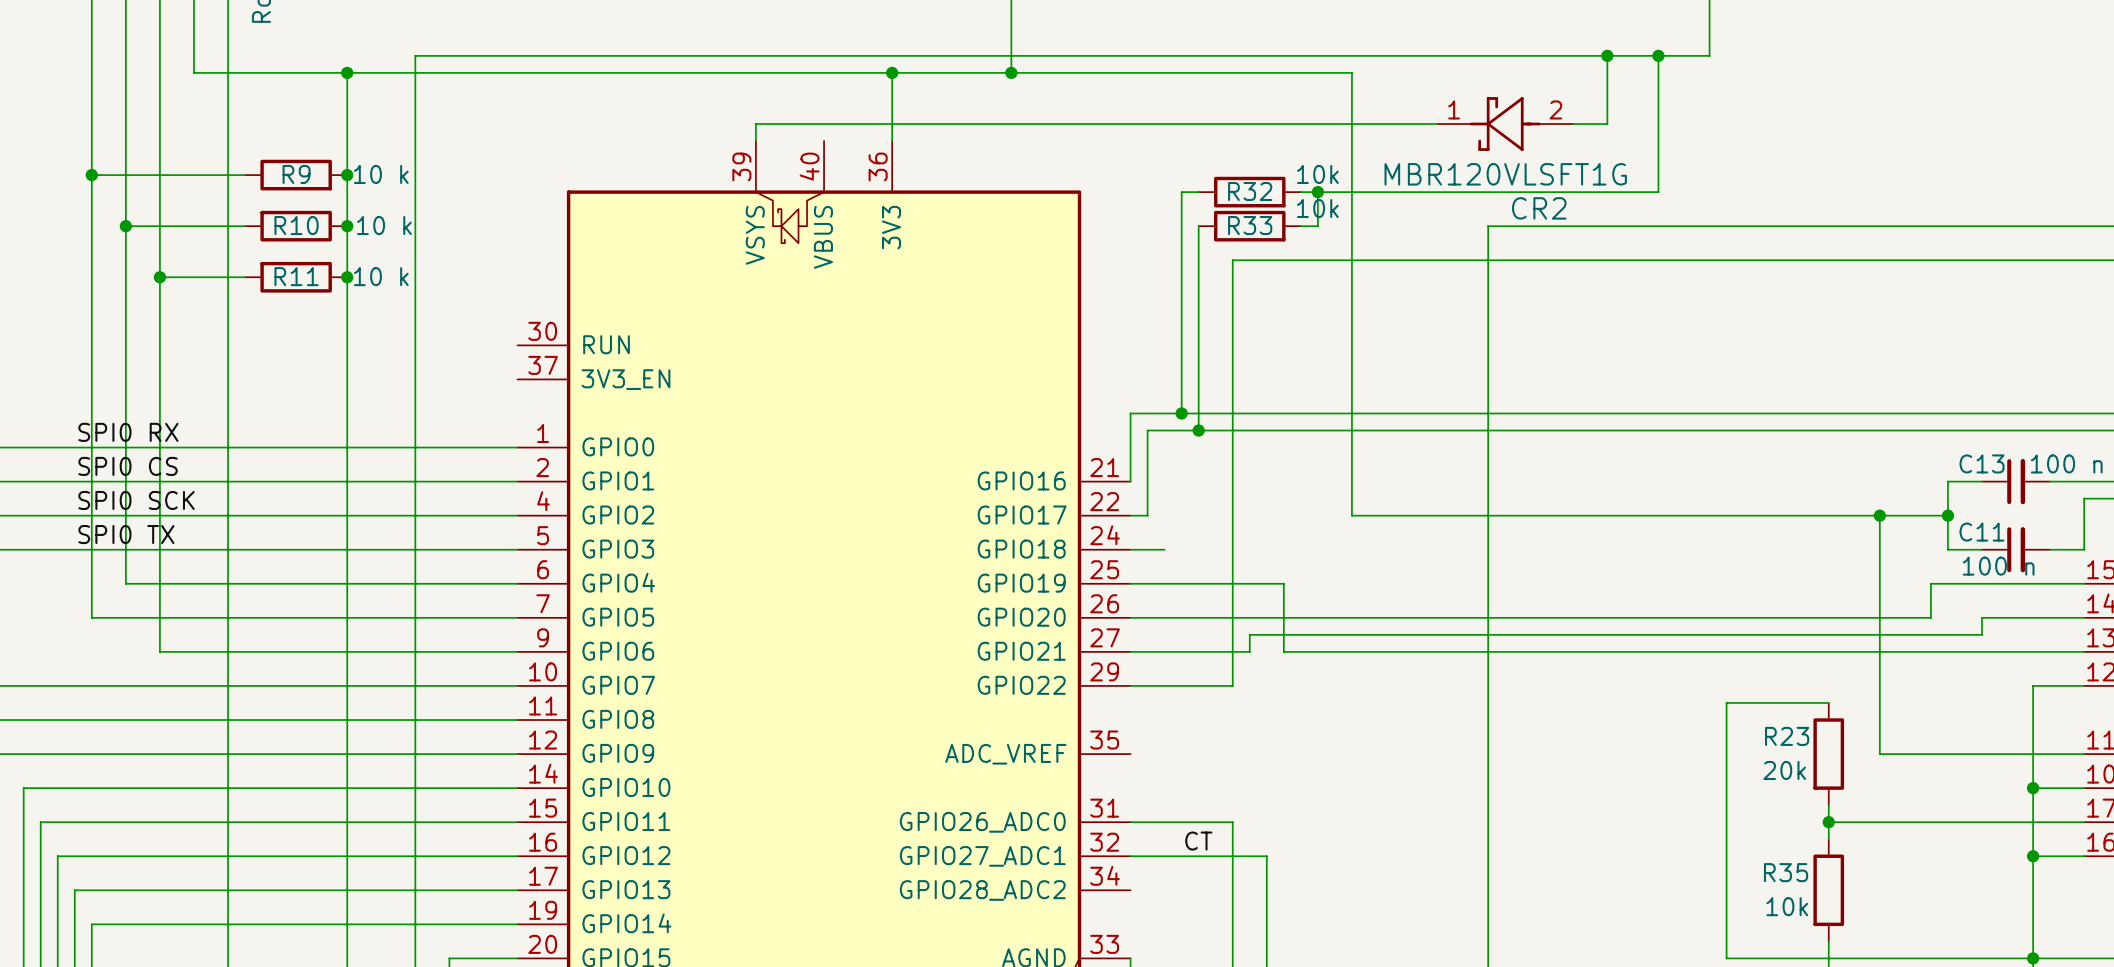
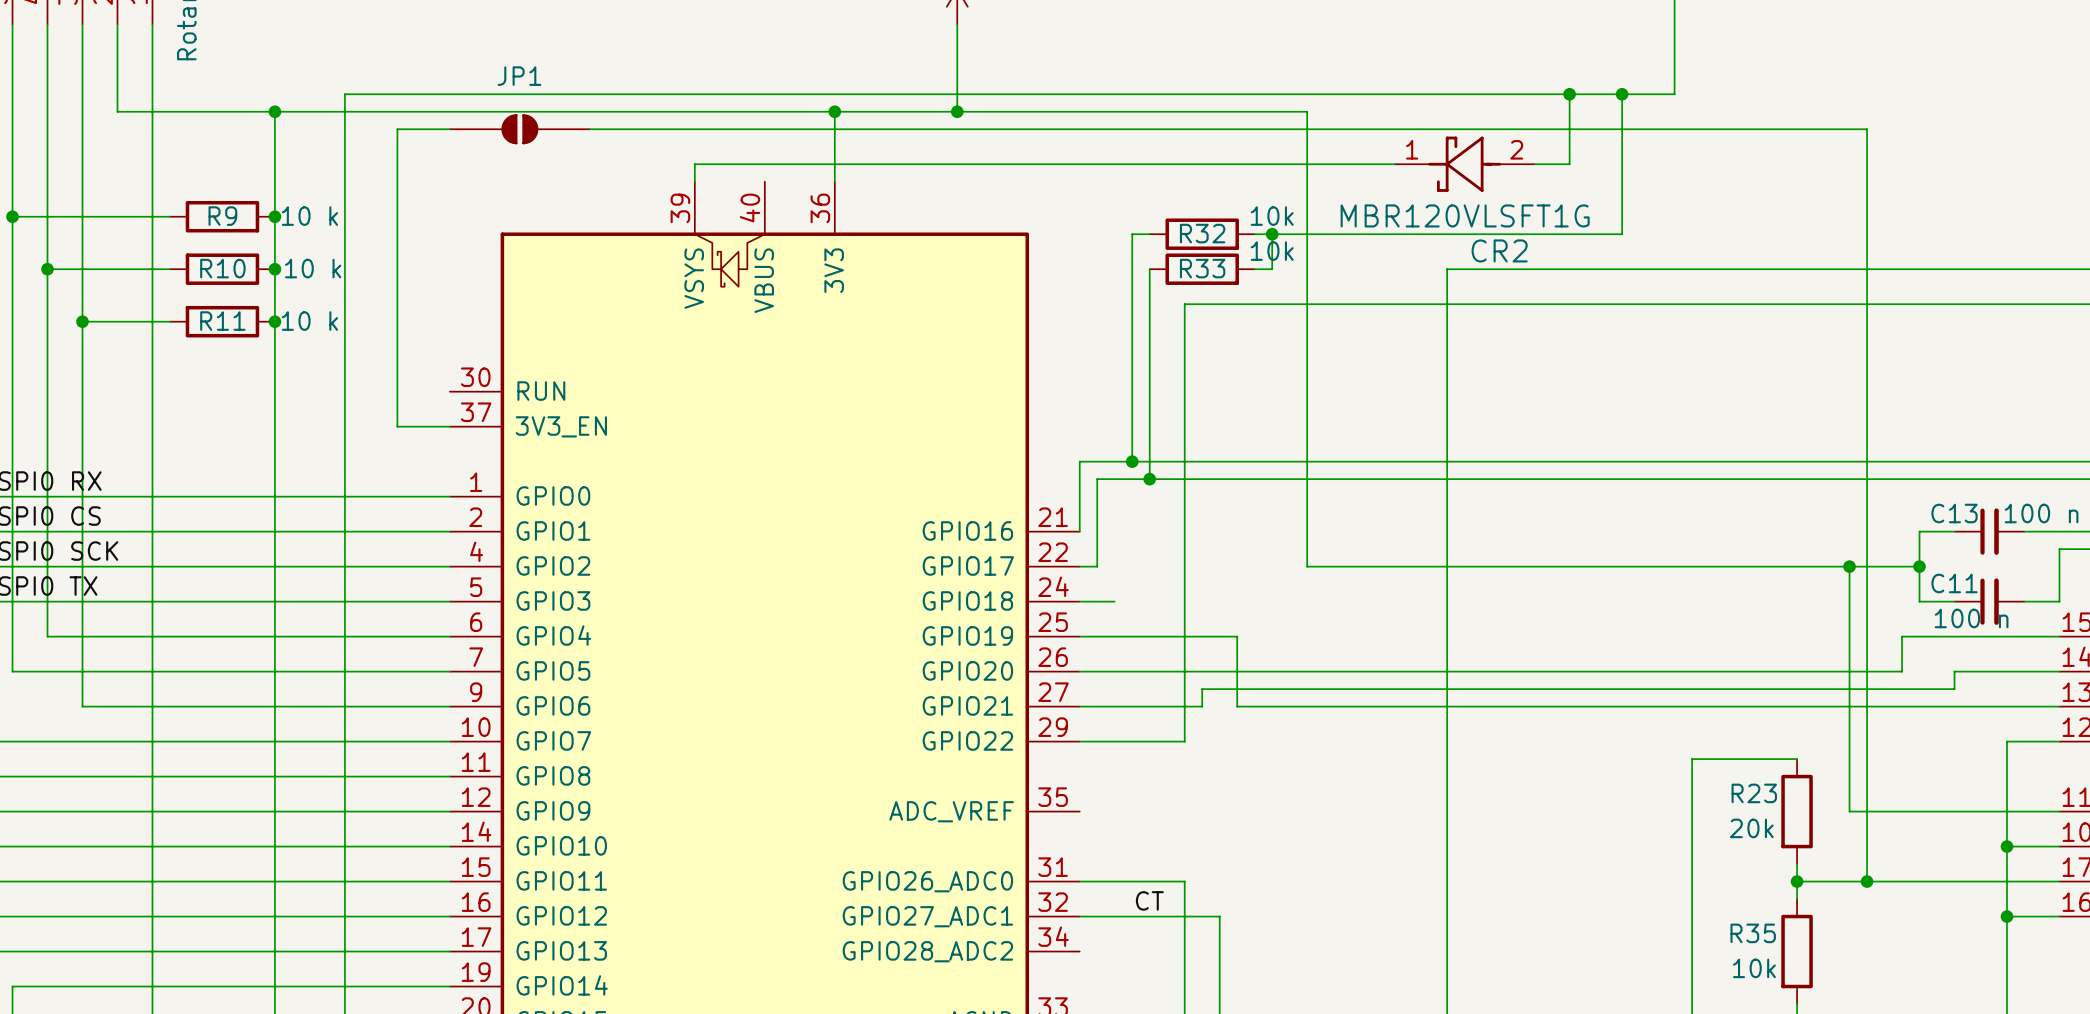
wire: none -> (449, 129) (397, 129) (397, 426) (449, 426)
JP1: none -> (519, 129)
wire: none -> (589, 129) (1867, 129) (1867, 881)
junction: none -> (1867, 881)

